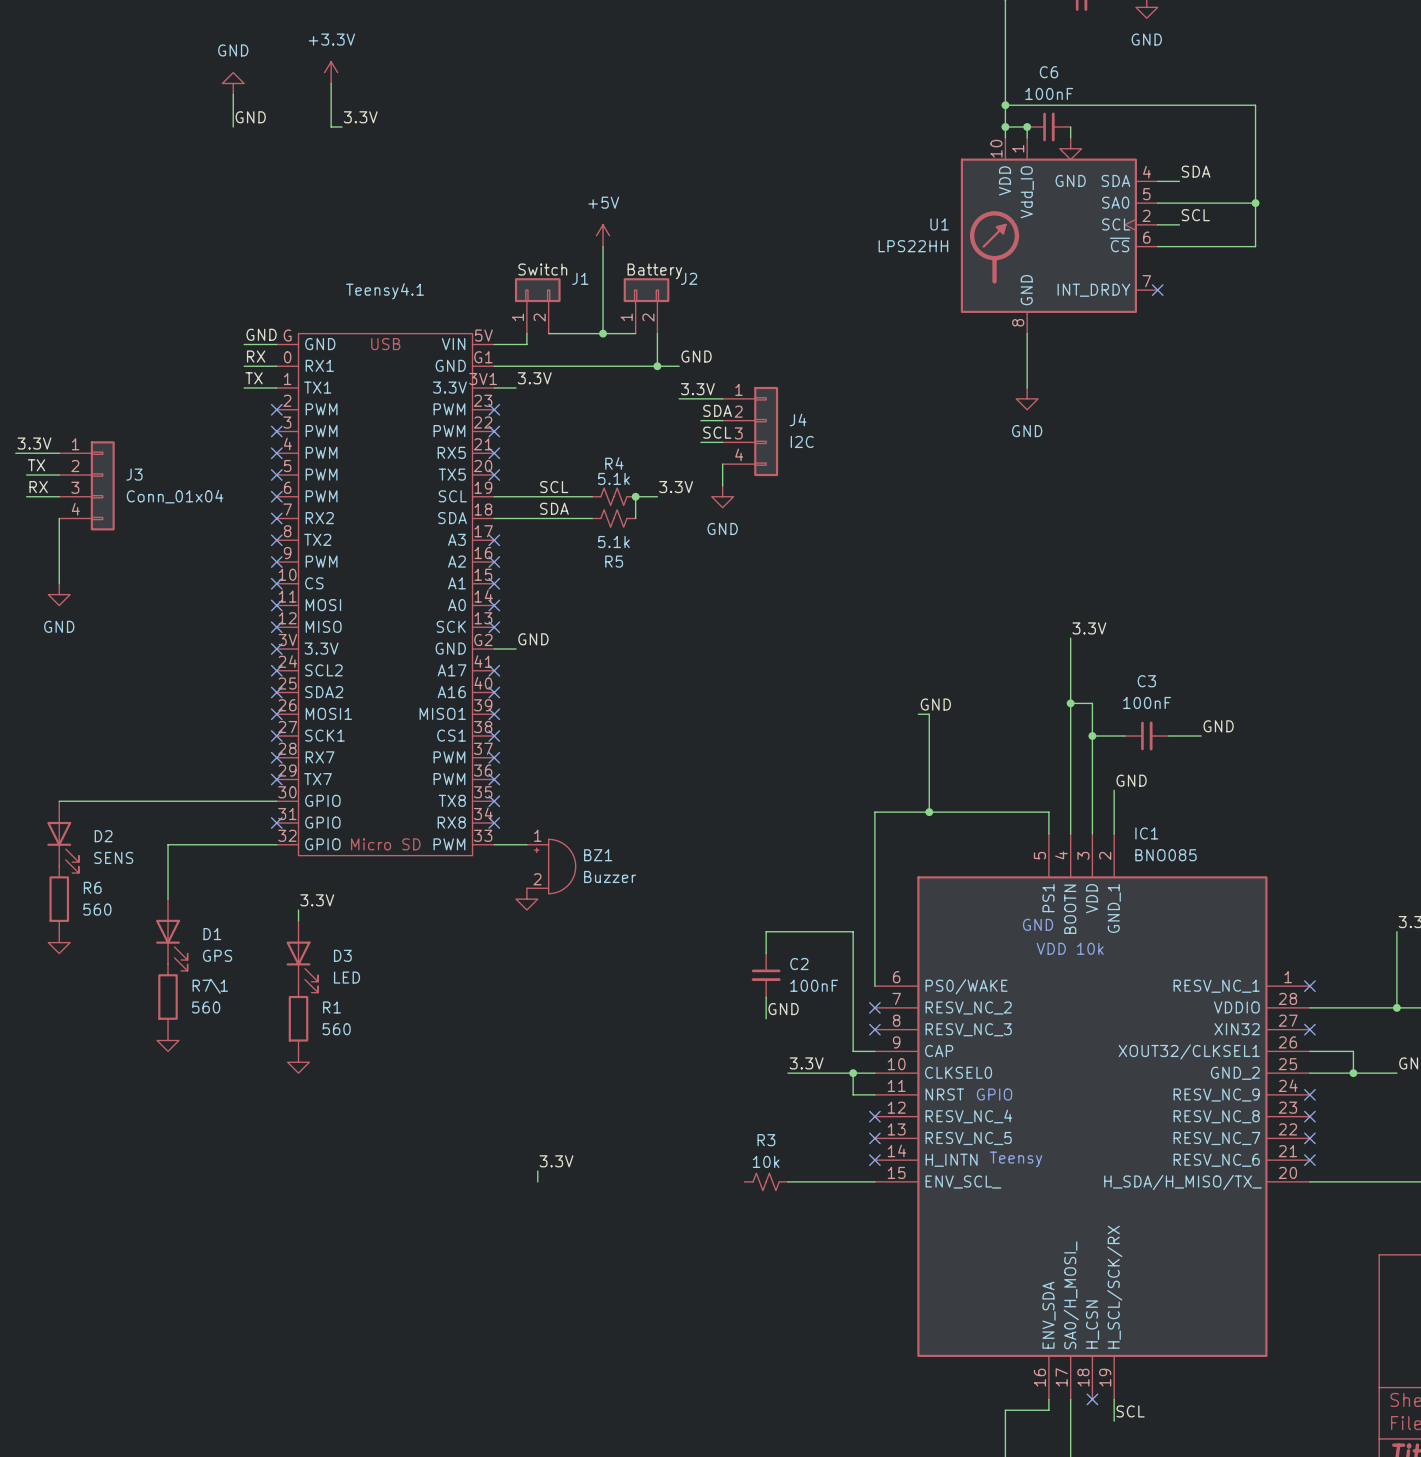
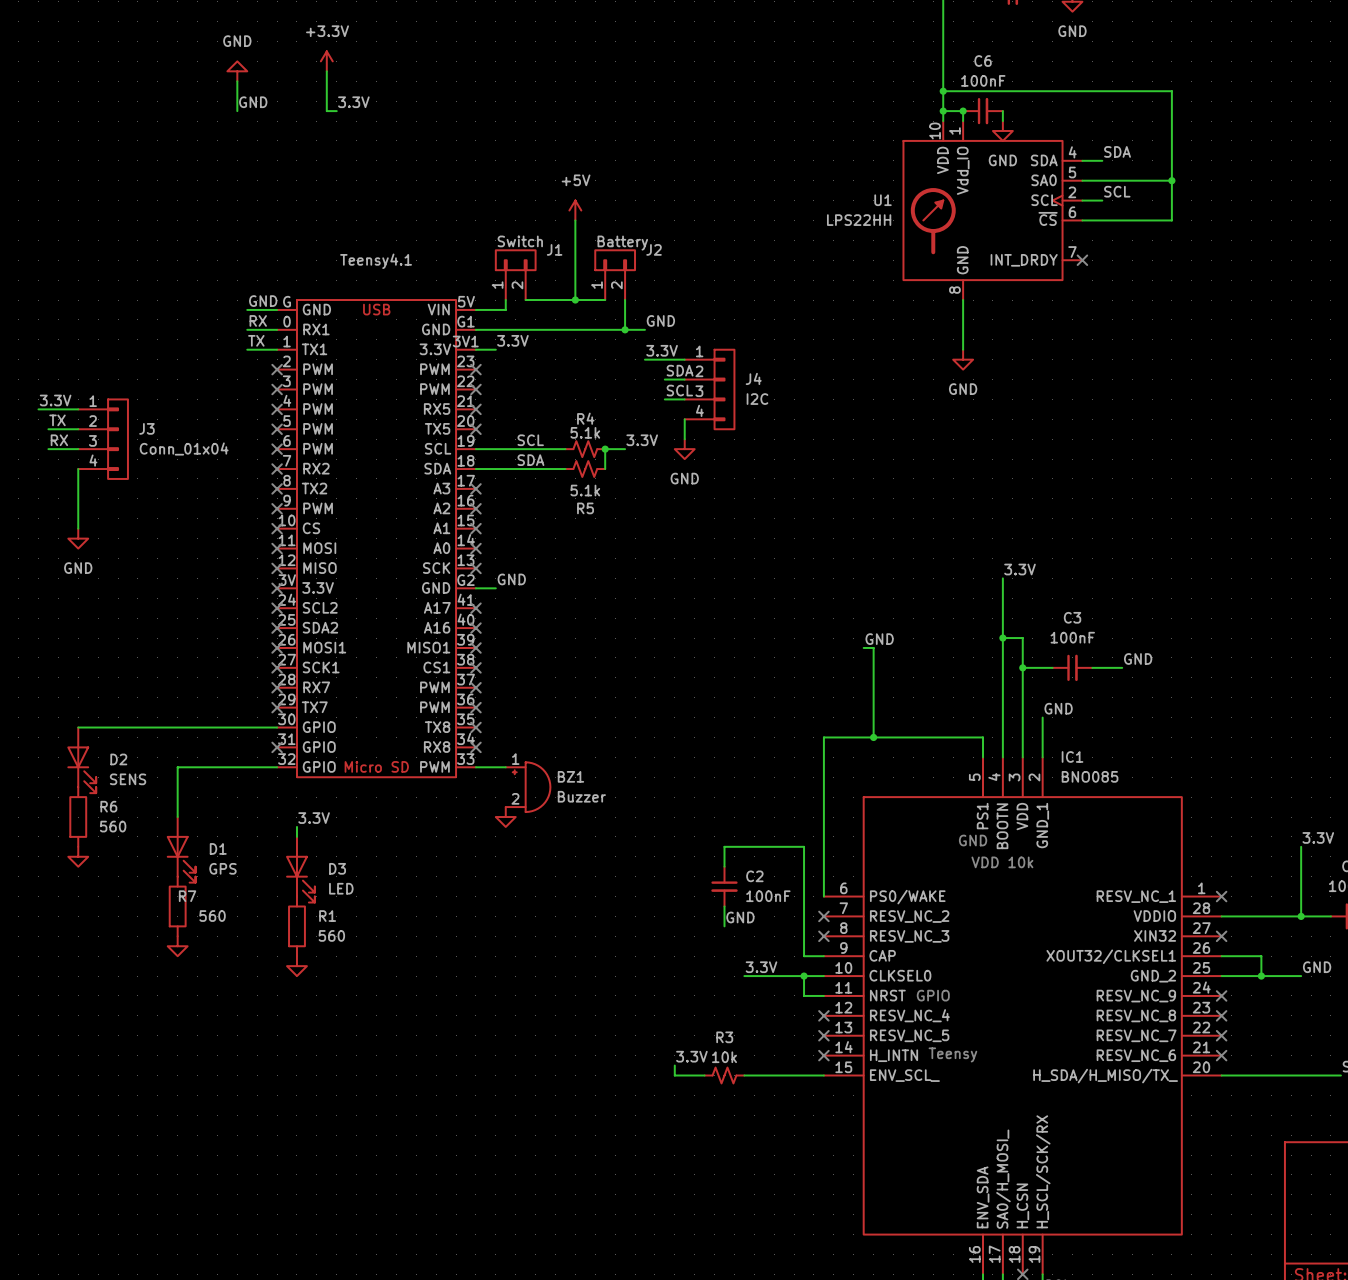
R7\1 name: R7\1 (210, 986) -> R7 (187, 896)
label position: 3.3V (556, 1161) -> 3.3V (691, 1056)
wire: (537, 1171) (537, 1181) -> none
wire: none -> (674, 1065) (674, 1075) (704, 1075)

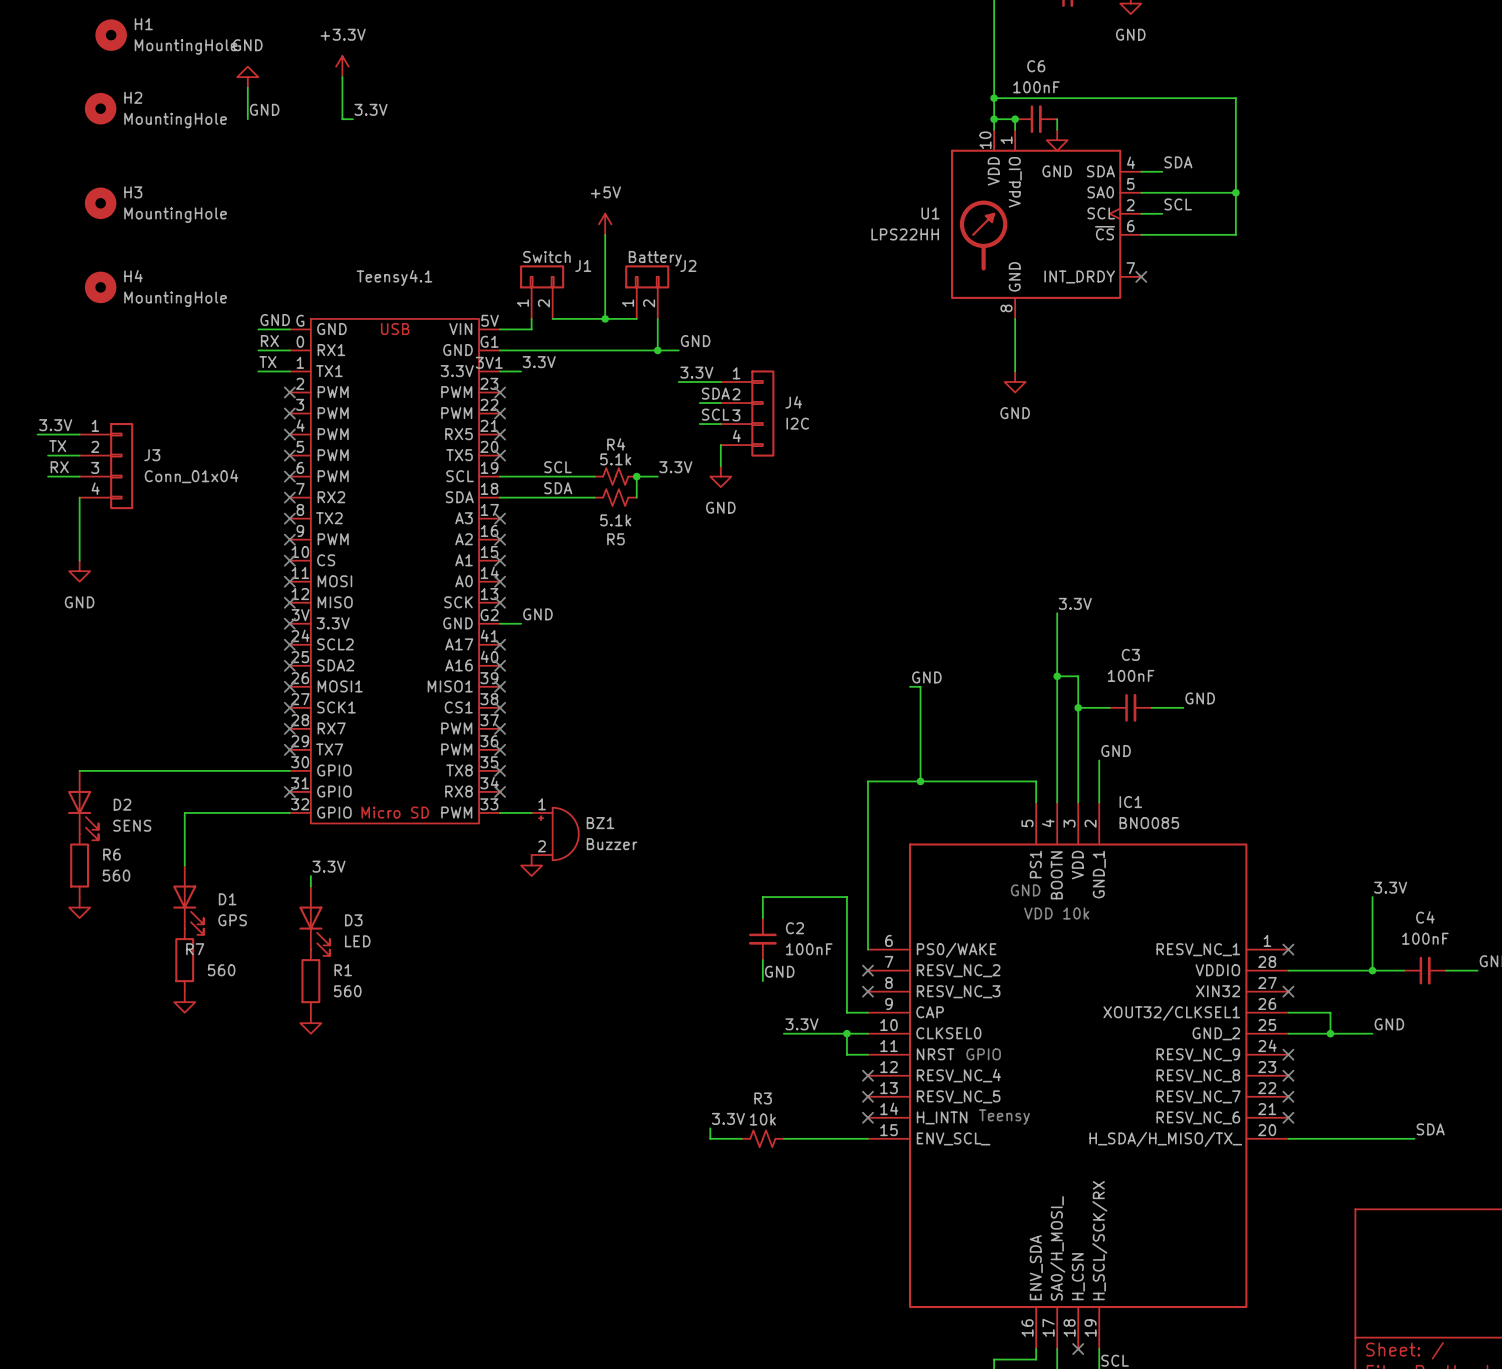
H1: none -> MountingHole (111, 35)
H2: none -> MountingHole (100, 108)
H3: none -> MountingHole (100, 203)
H4: none -> MountingHole (100, 287)

